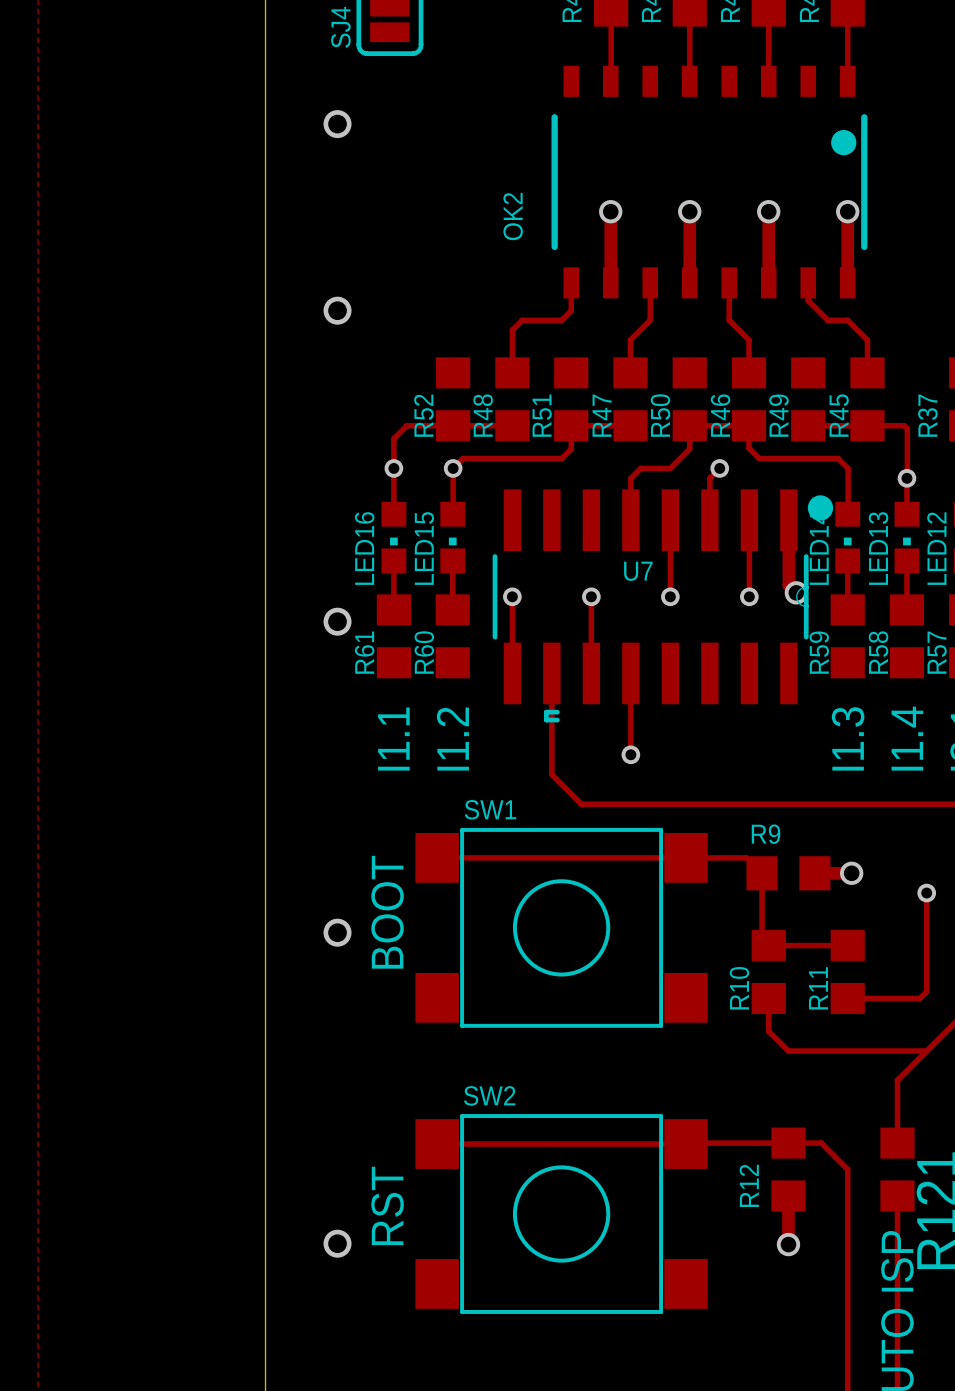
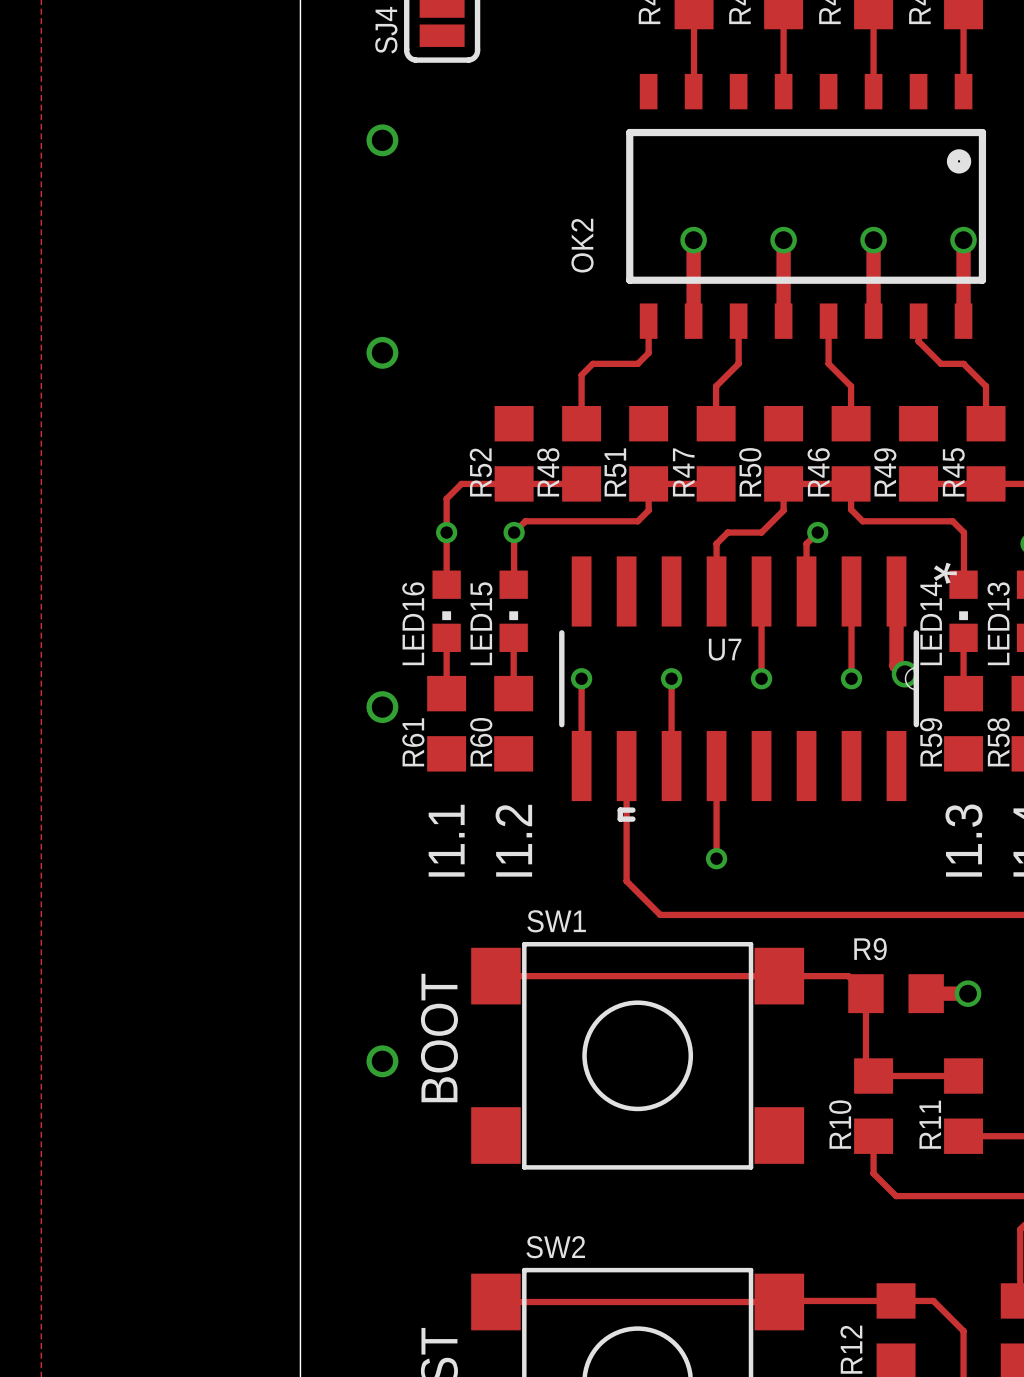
OK2 footprint: [551, 65, 868, 299] -> [626, 73, 987, 339]
U7 footprint: [492, 489, 834, 723] -> [559, 556, 920, 822]

